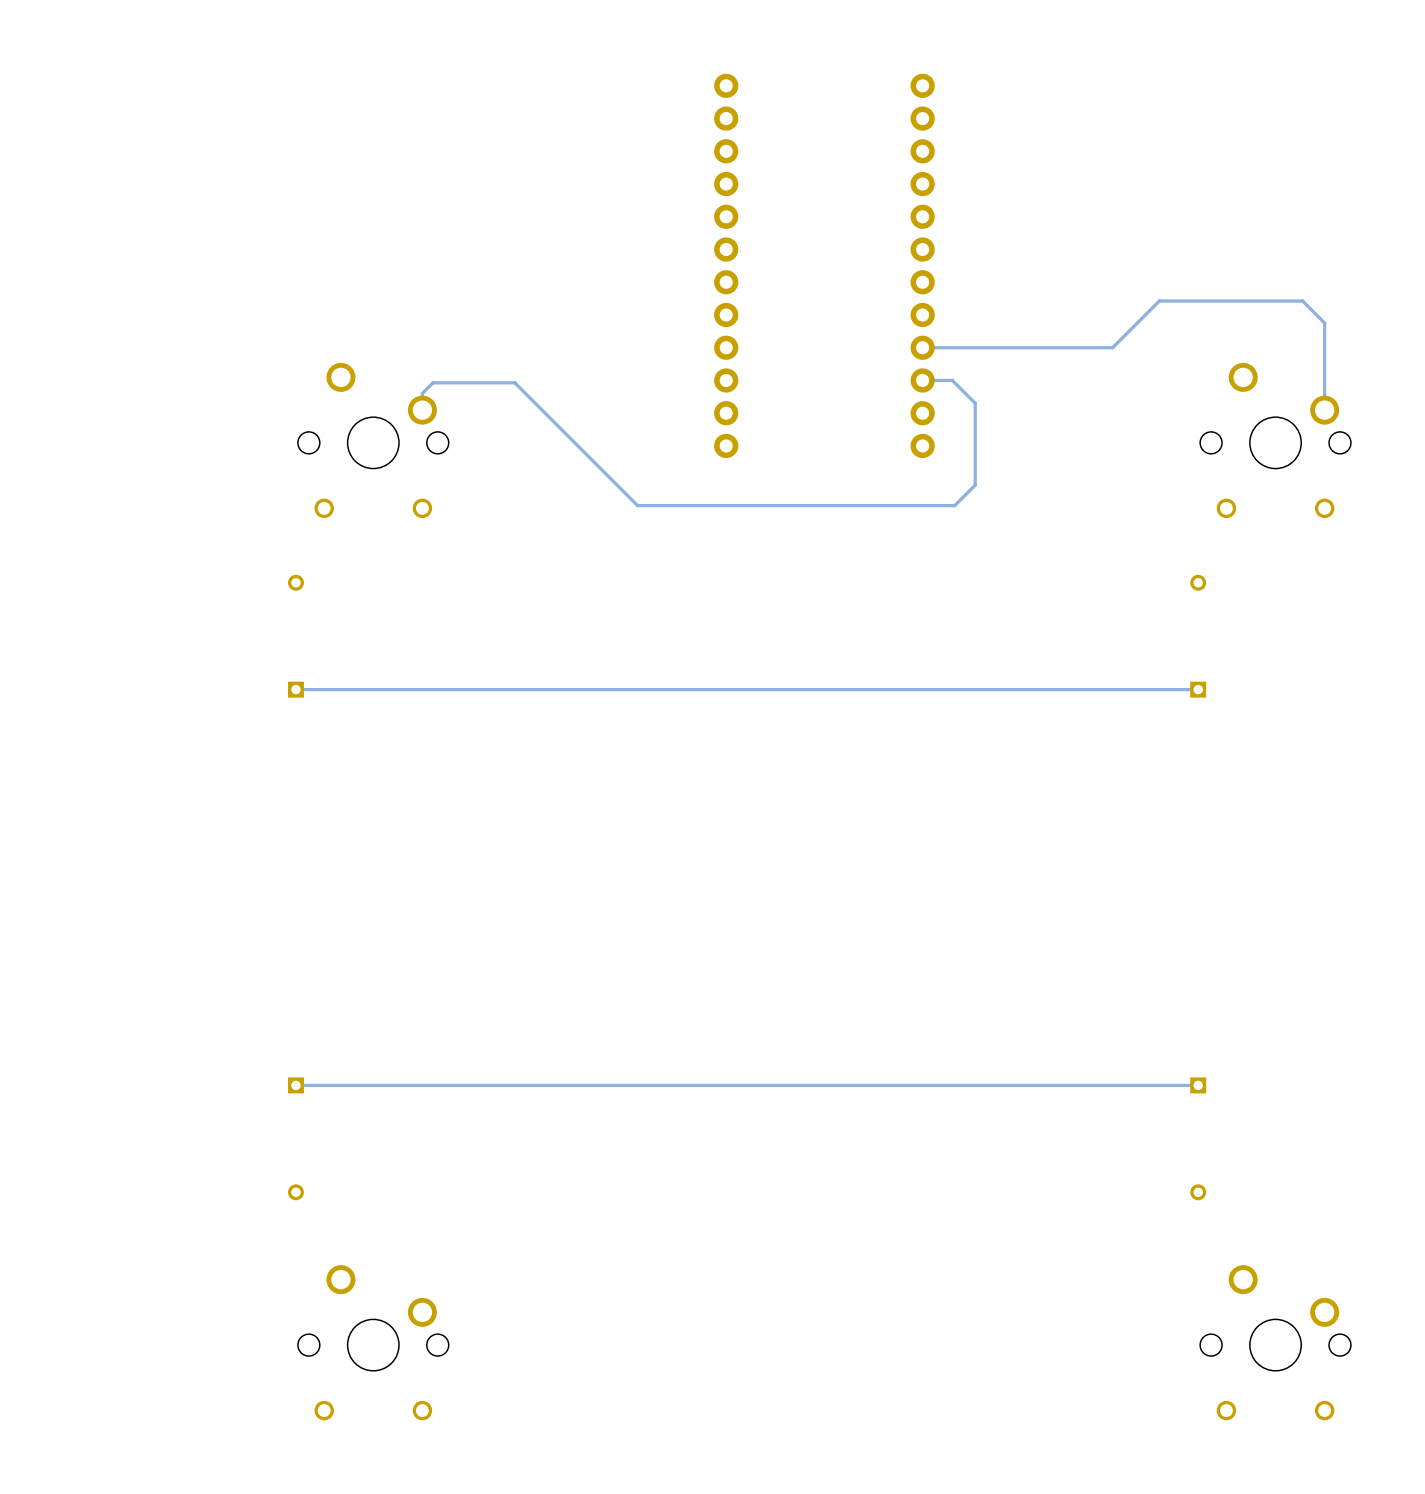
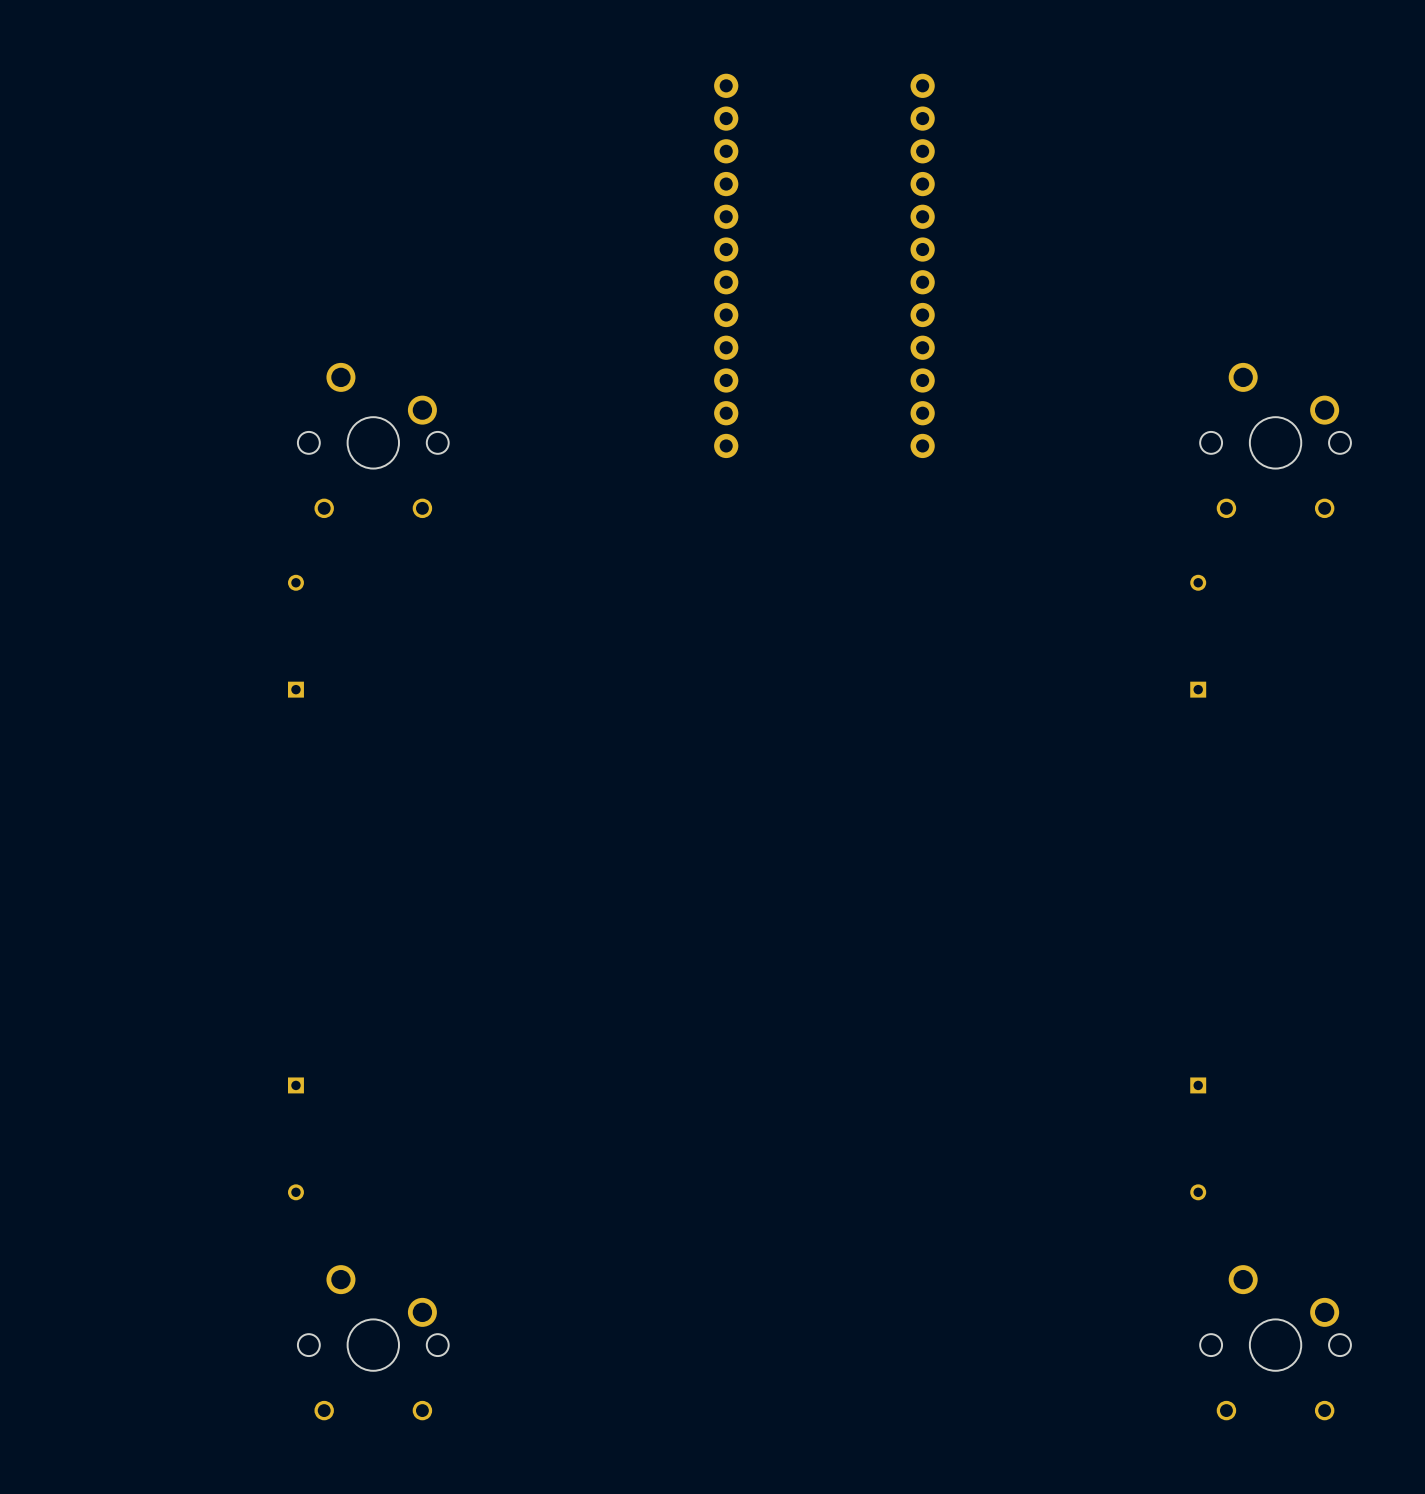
track: (922, 347) (1112, 347) (1159, 301) (1302, 301) (1324, 323) (1324, 410) -> none
track: (922, 380) (952, 380) (975, 403) (975, 485) (954, 505) (637, 505) (514, 382) (433, 382) (422, 393) (422, 410) -> none
track: (1198, 689) (295, 689) -> none
track: (1198, 1085) (295, 1085) -> none

